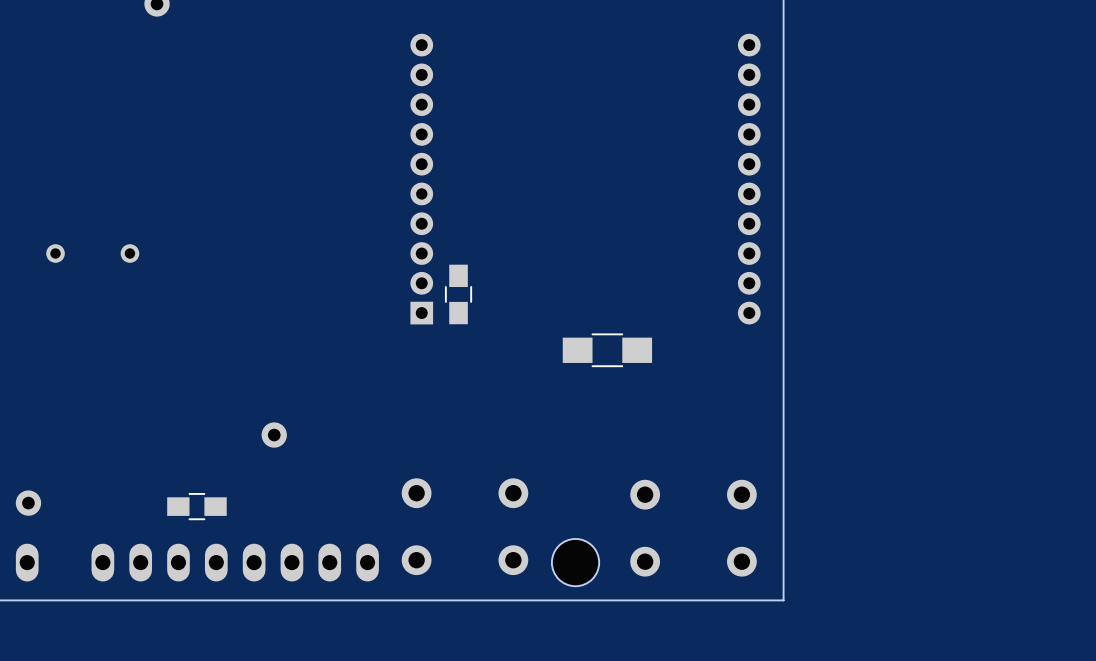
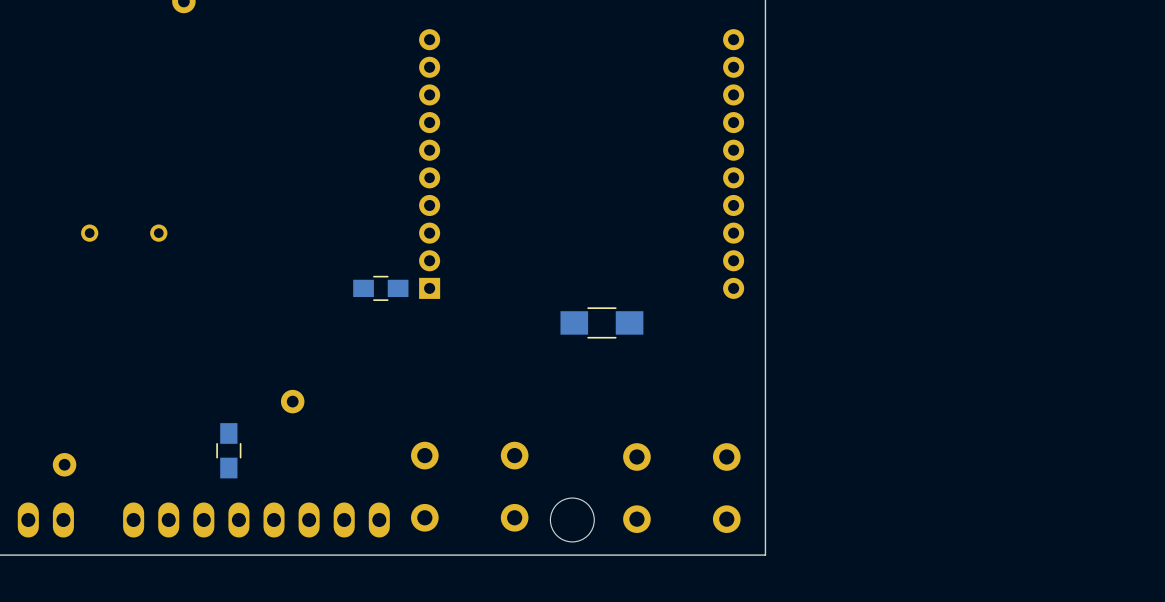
part rotation: 0° (458, 294) -> 90° clockwise (380, 288)
part position: (458, 294) -> (380, 288)
part rotation: 0° (196, 506) -> 90° clockwise (228, 450)

